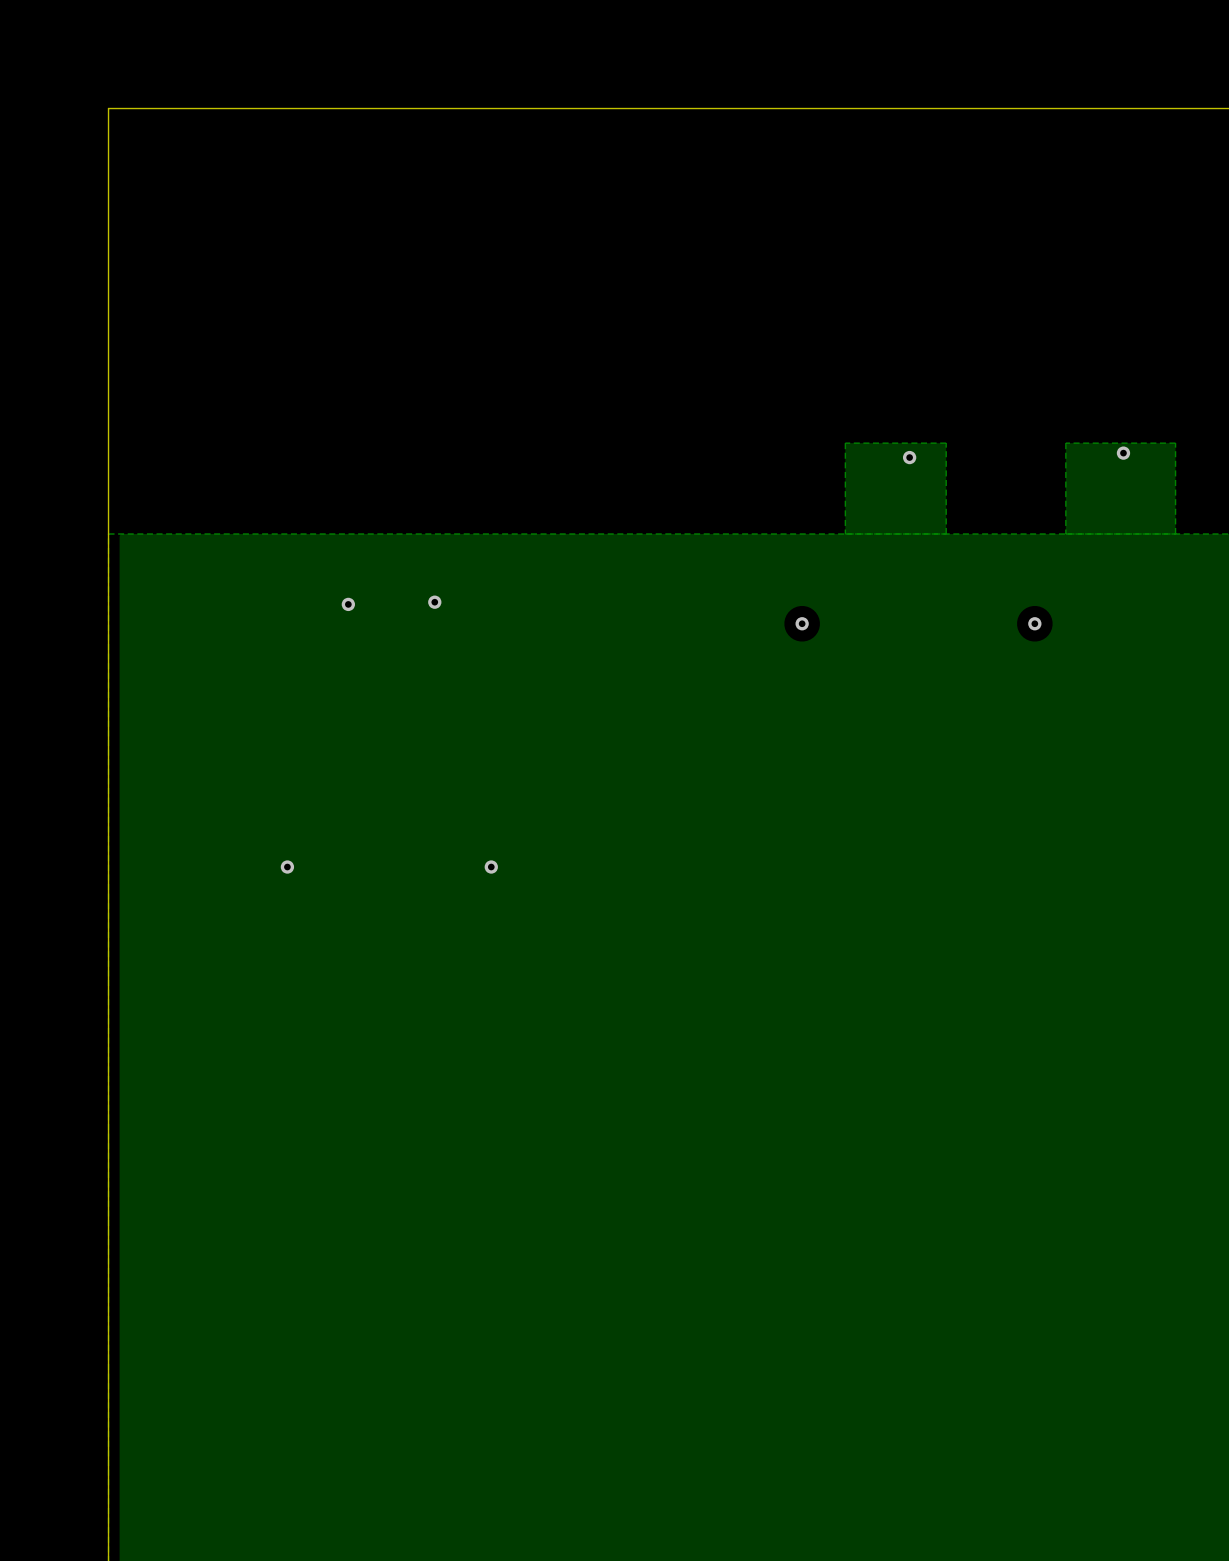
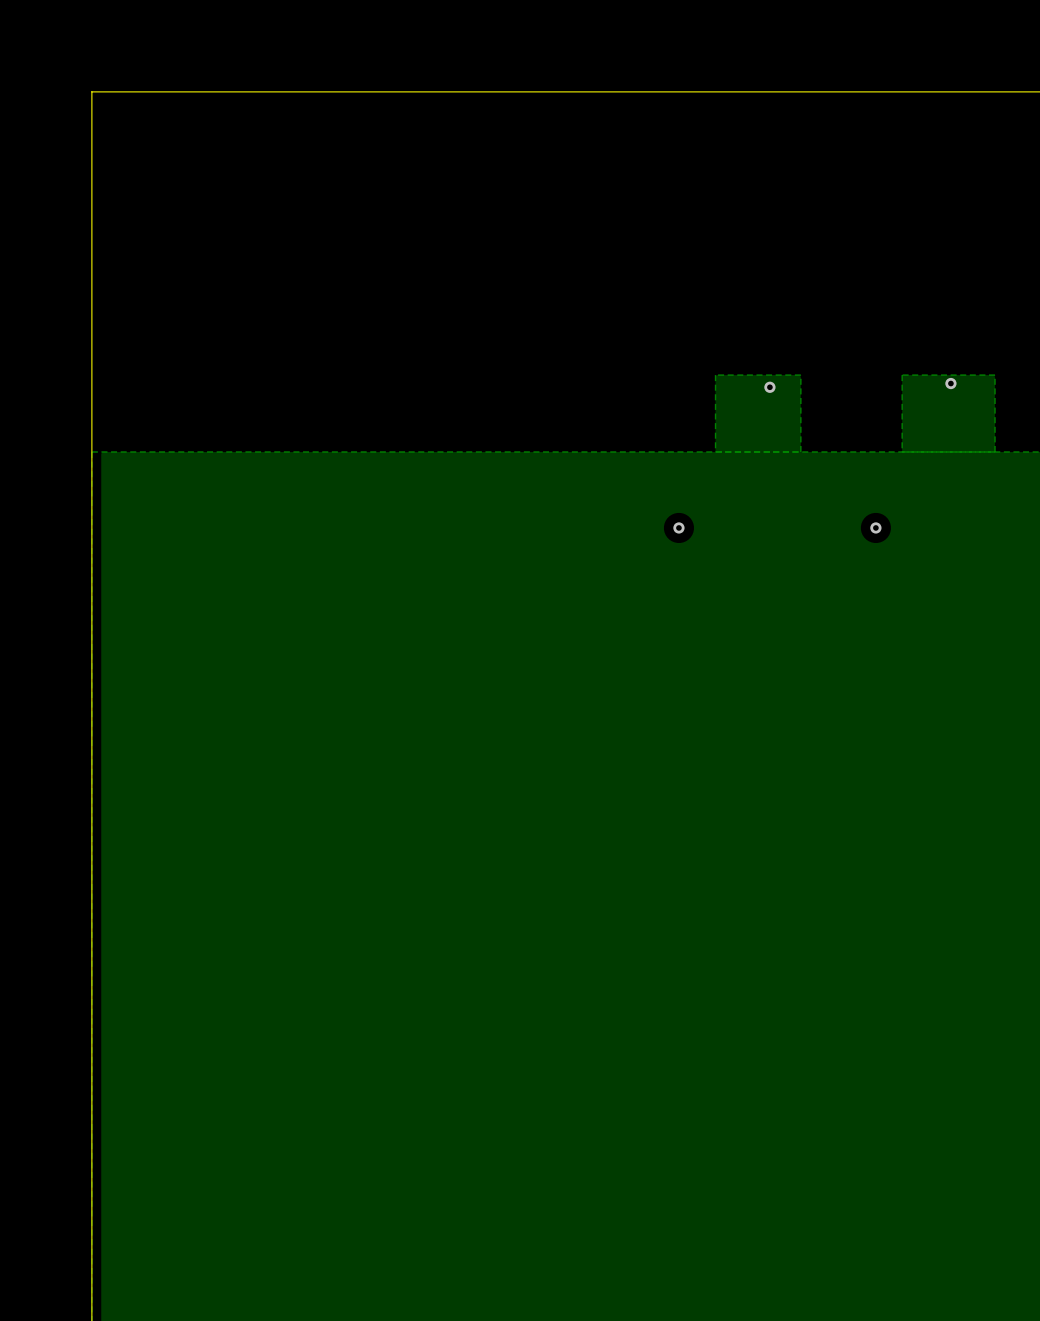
via: (434, 602) -> none
via: (348, 604) -> none
via: (287, 867) -> none
via: (491, 867) -> none

